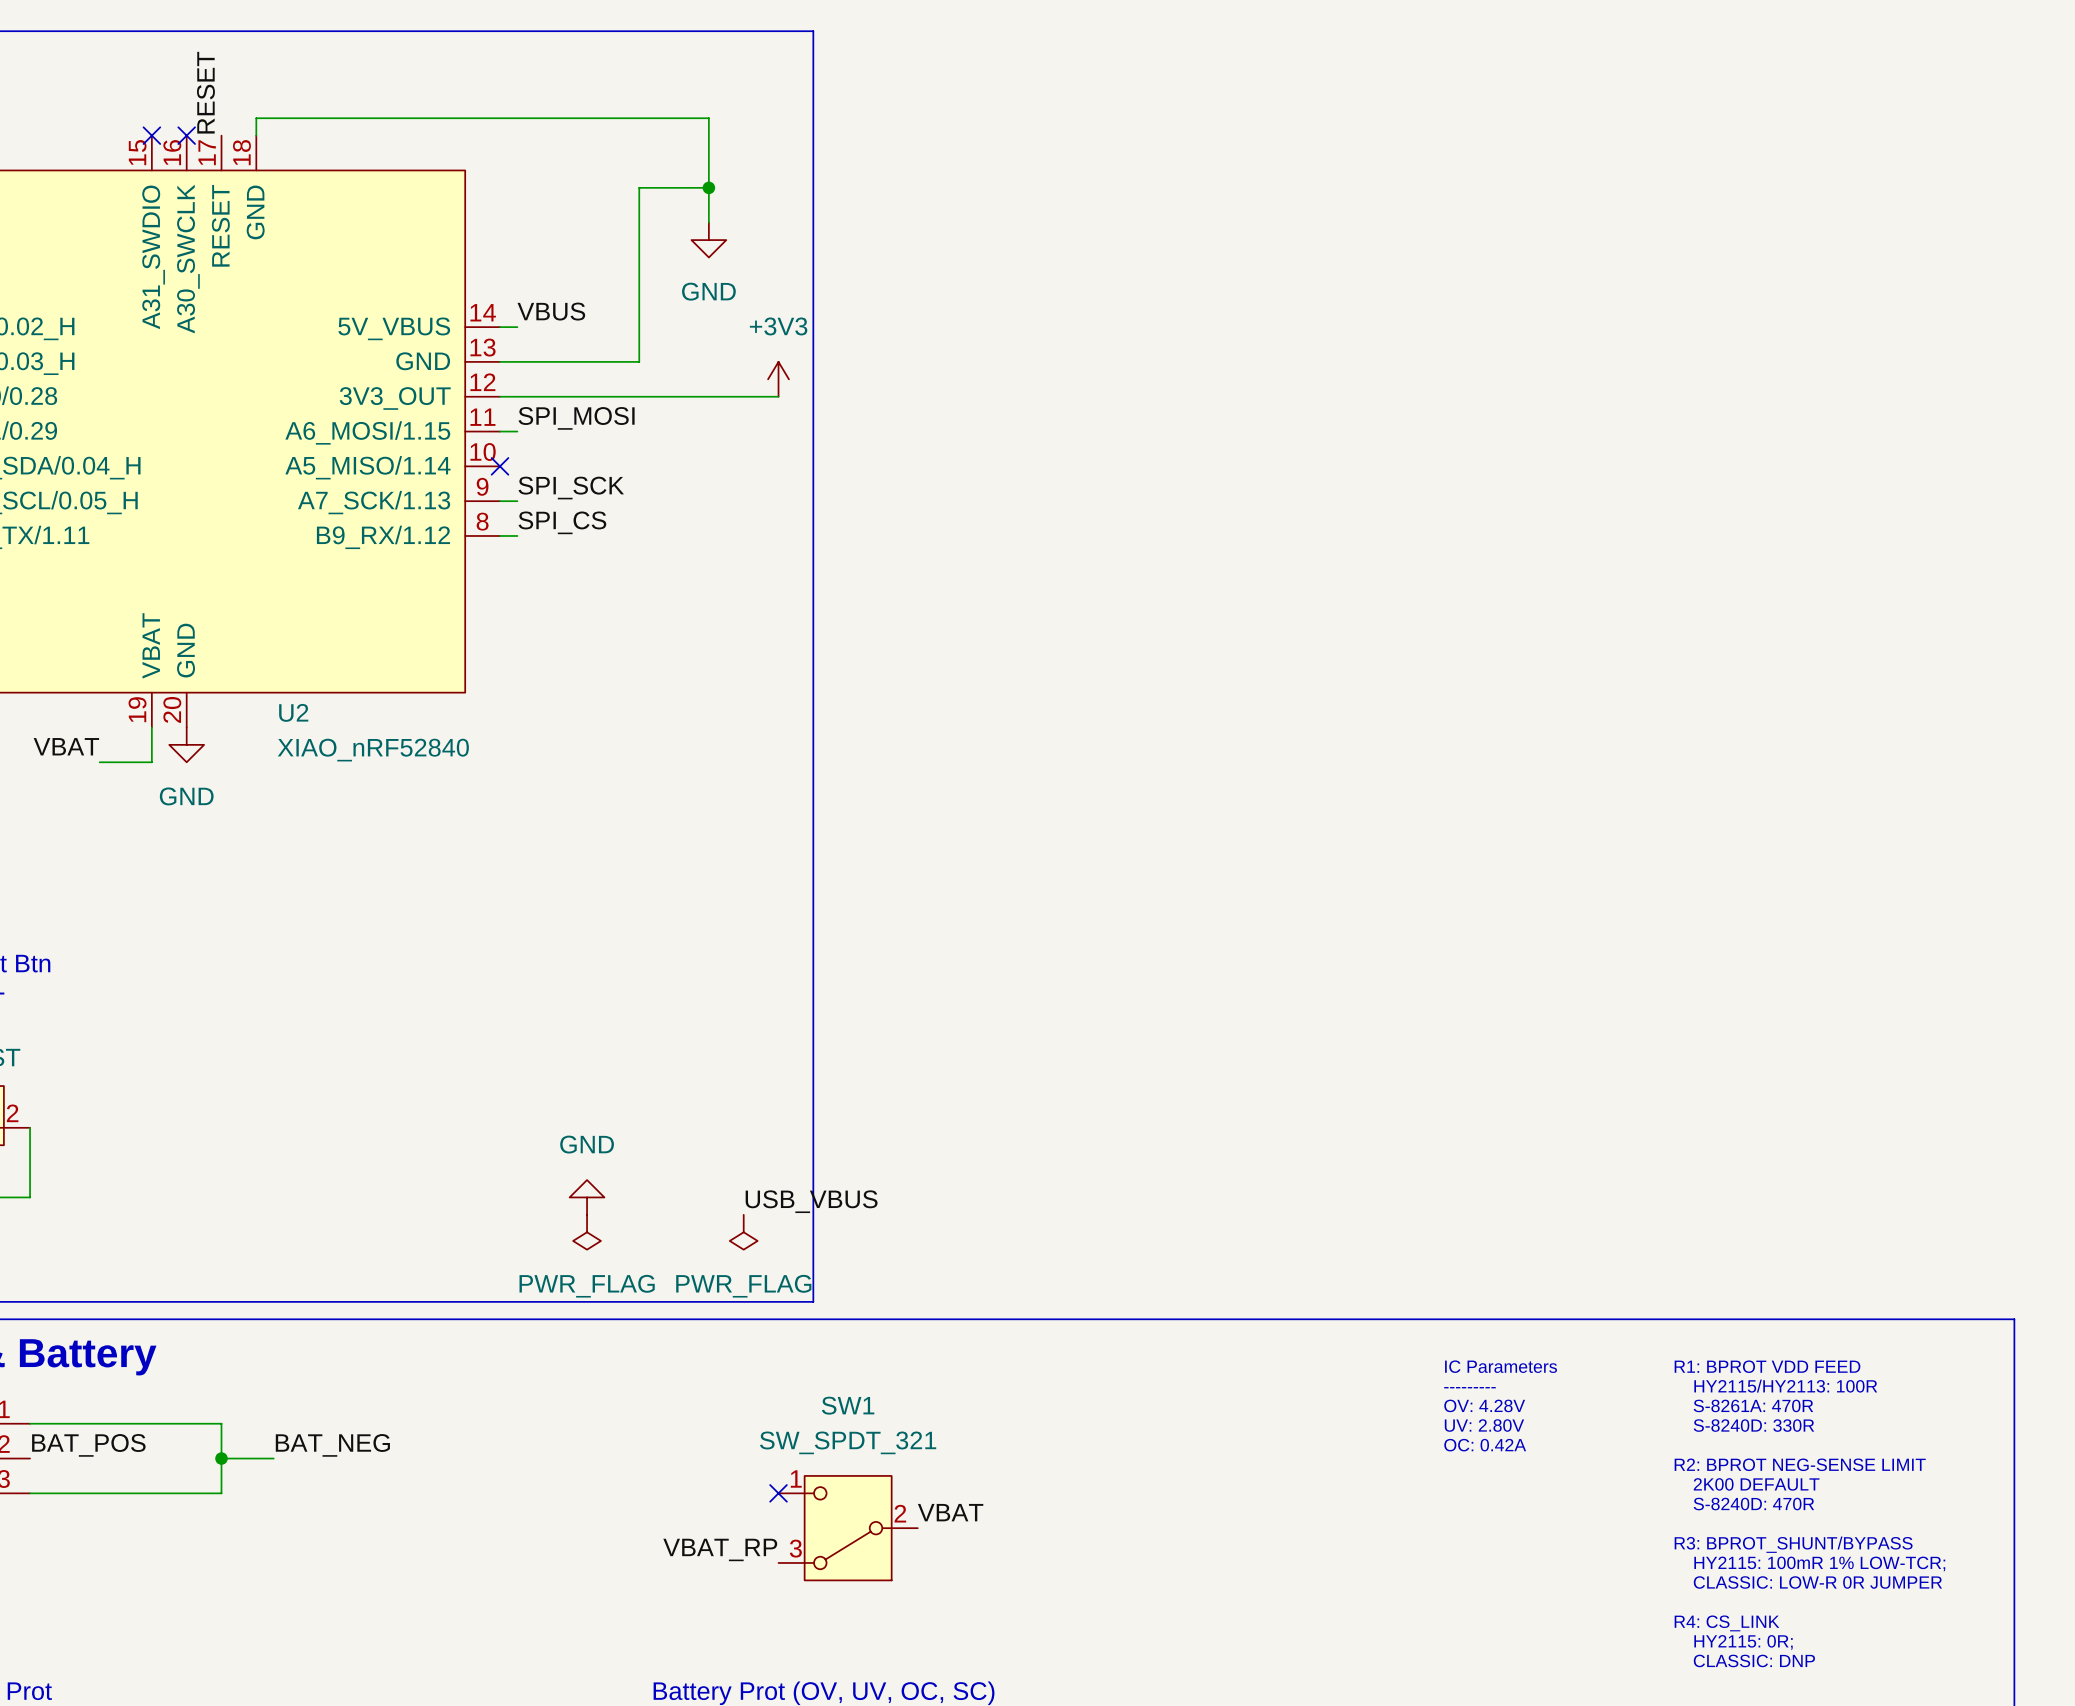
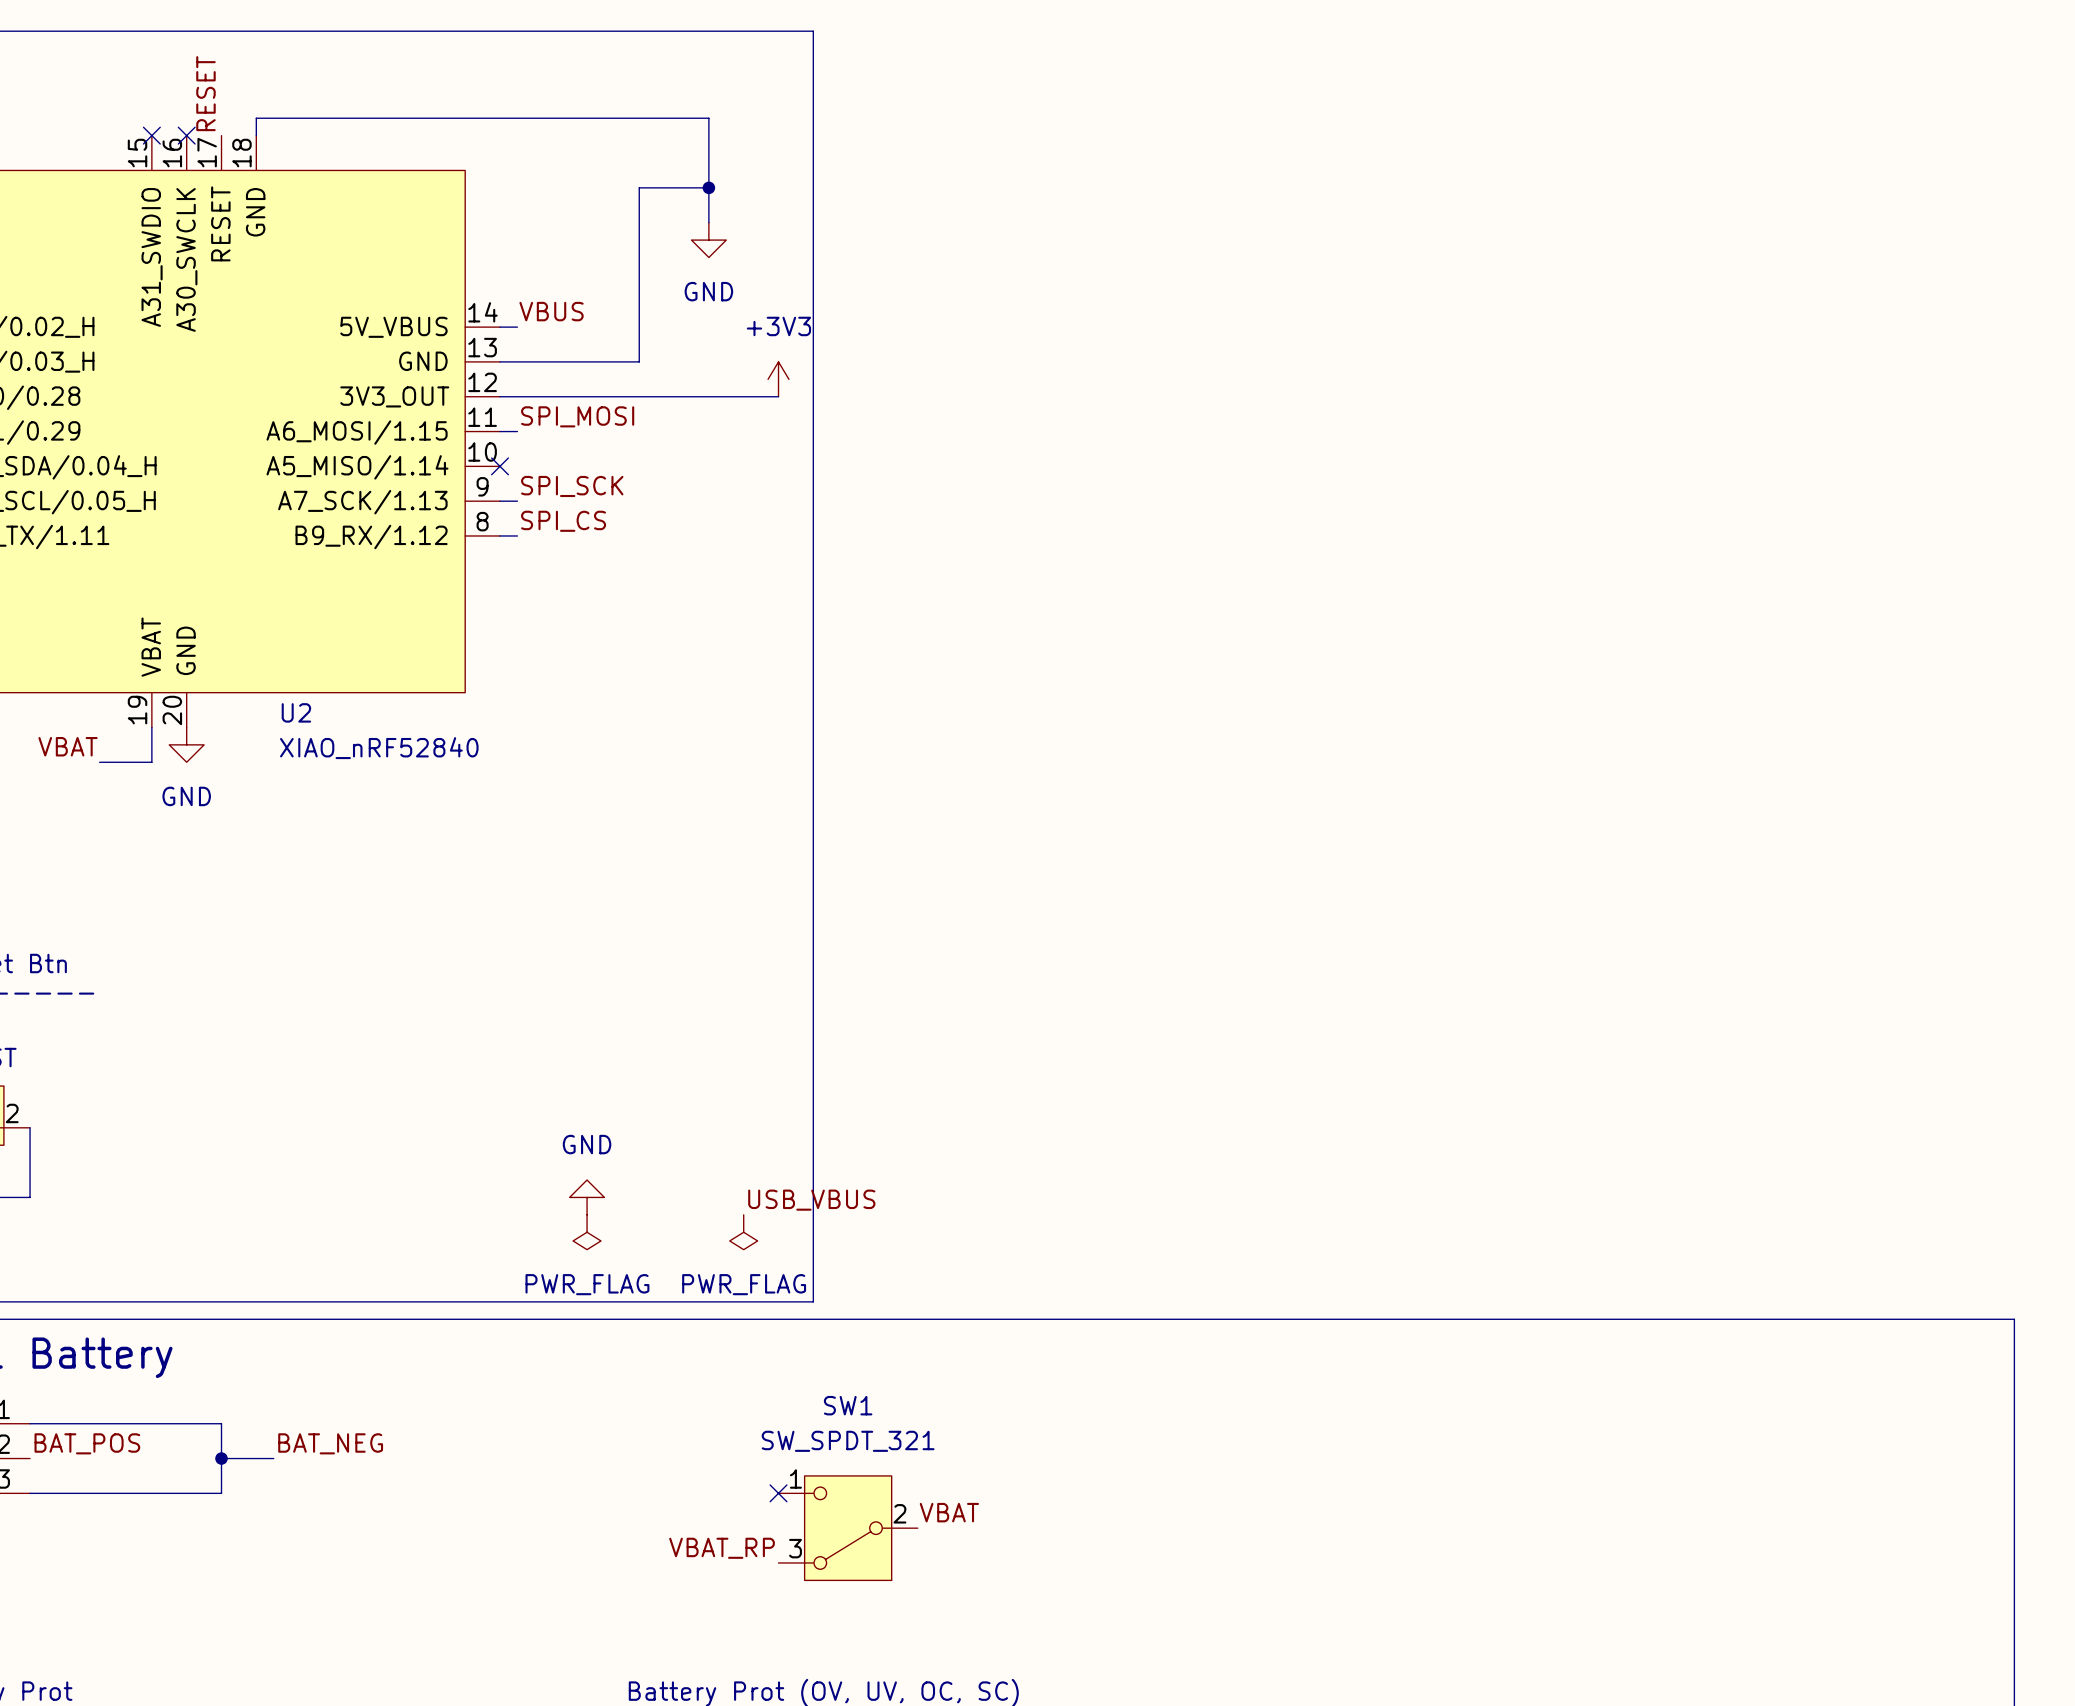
text: IC Parameters (1501, 1366) -> none
text: R1: BPROT VDD FEED (1767, 1366) -> none
text: HY2115/HY2113: 100R (1785, 1386) -> none
text: --------- (1469, 1387) -> none
text: OV: 4.28V (1484, 1405) -> none
text: S-8261A: 470R (1753, 1405) -> none
text: UV: 2.80V (1484, 1425) -> none
text: S-8240D: 330R (1753, 1425) -> none
text: OC: 0.42A (1485, 1445) -> none
text: R2: BPROT NEG-SENSE LIMIT (1800, 1464) -> none
text: 2K00 DEFAULT (1756, 1484) -> none
text: S-8240D: 470R (1753, 1504) -> none
text: R3: BPROT_SHUNT/BYPASS (1793, 1544) -> none
text: HY2115: 100mR 1% LOW-TCR; (1819, 1563) -> none
text: CLASSIC: LOW-R 0R JUMPER (1817, 1582) -> none
text: R4: CS_LINK (1727, 1623) -> none
text: HY2115: 0R; (1743, 1642) -> none
text: CLASSIC: DNP (1754, 1660) -> none

